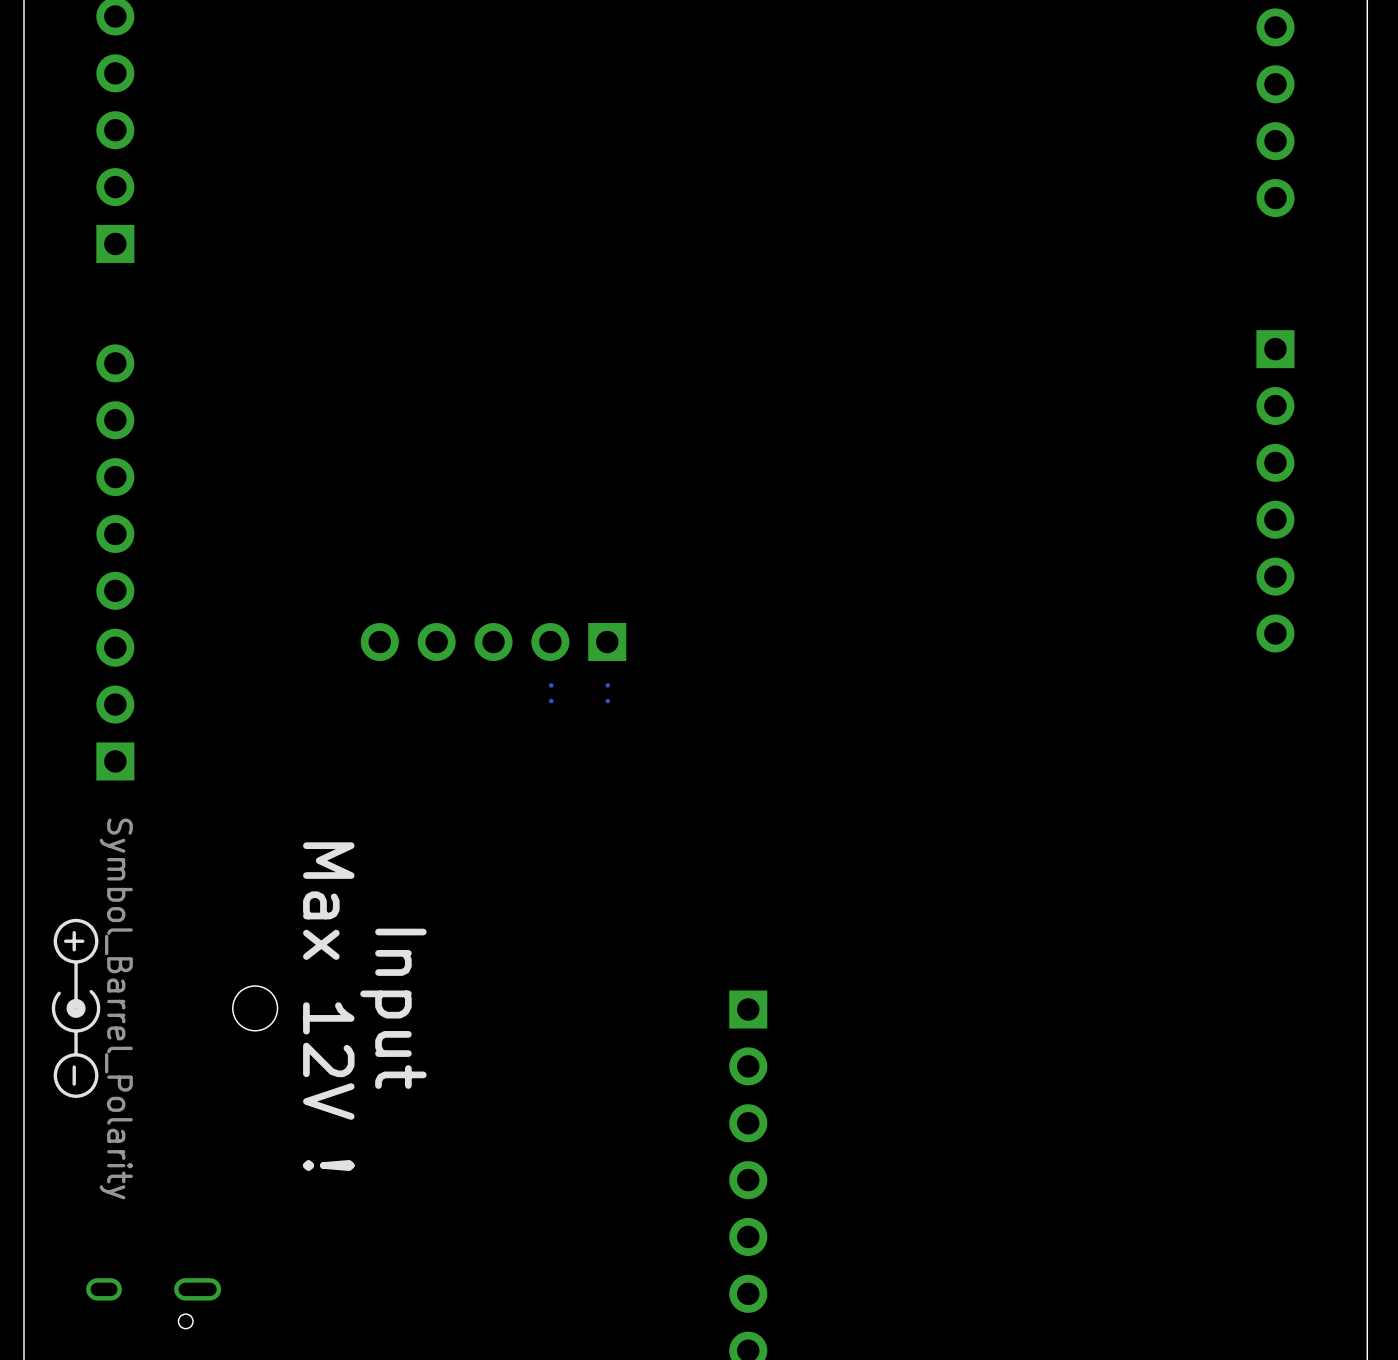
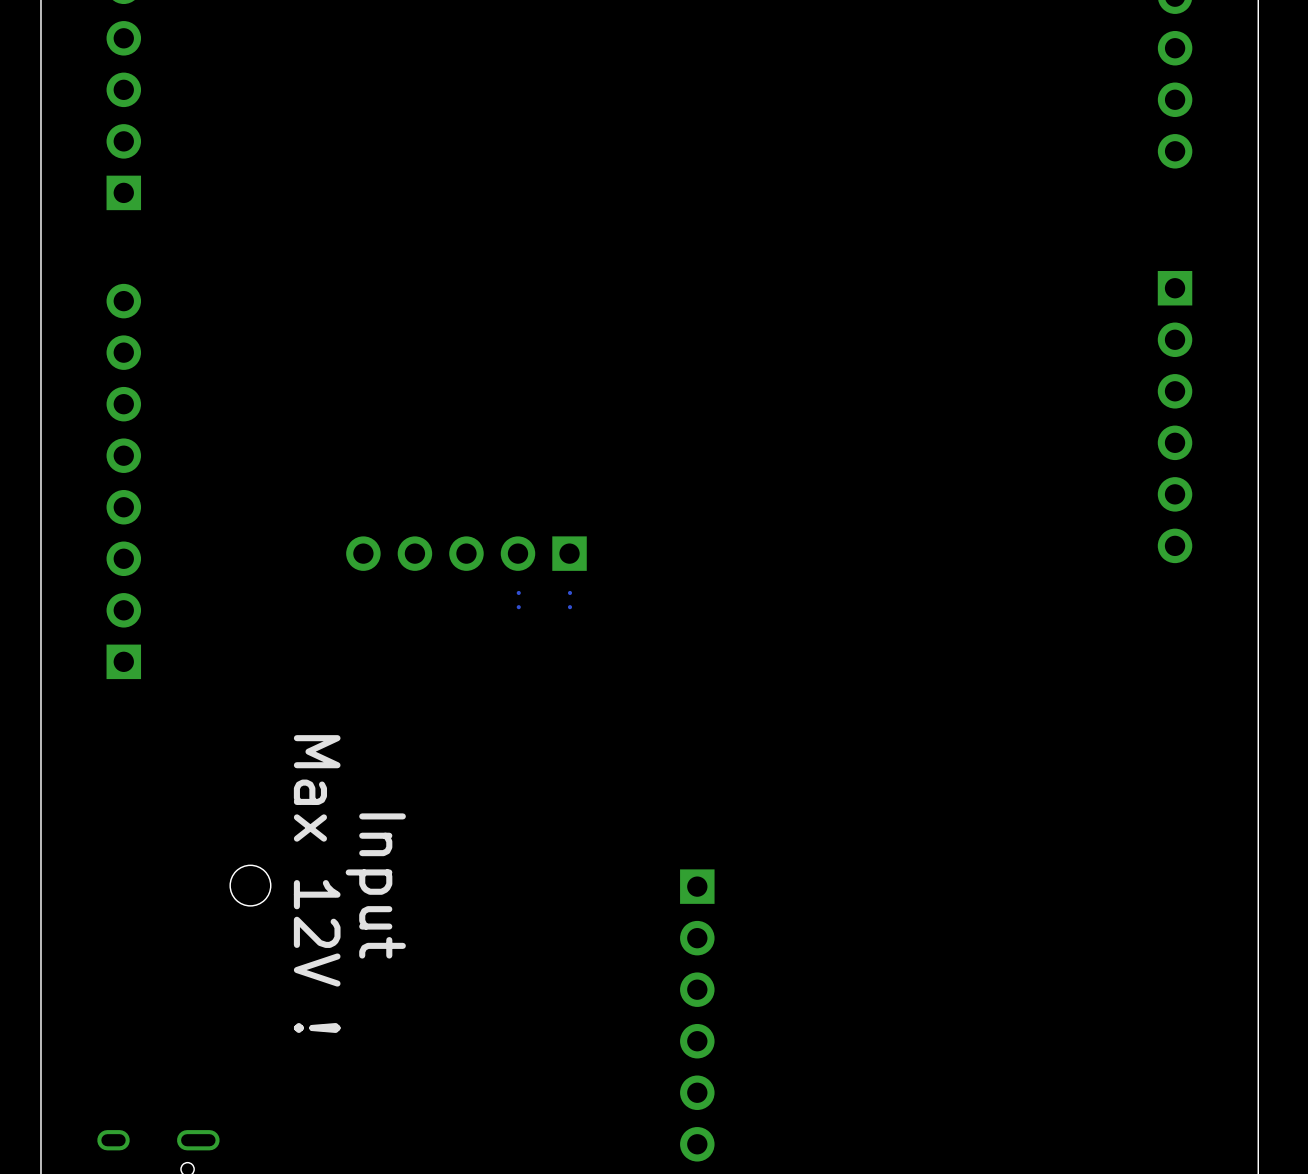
drawing: [51, 918, 101, 1098] -> none
text: + (74, 941) -> none
text: - (74, 1075) -> none

